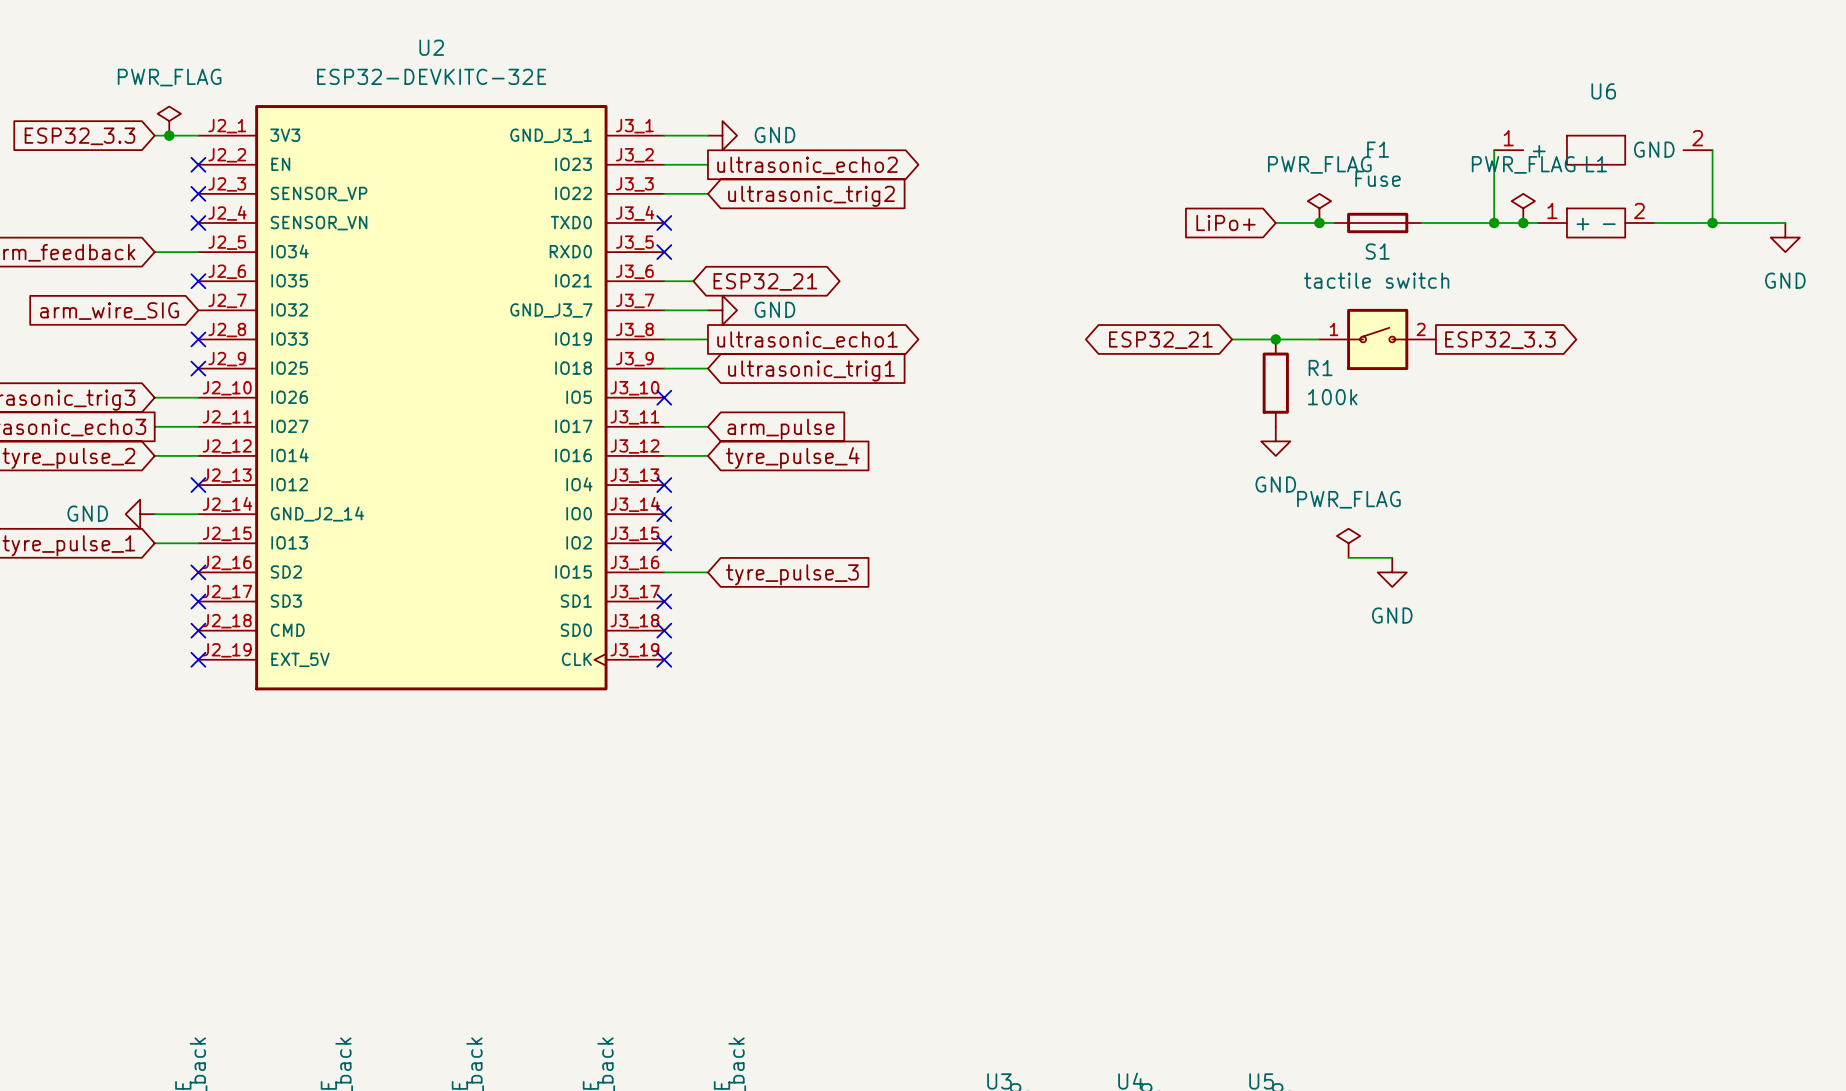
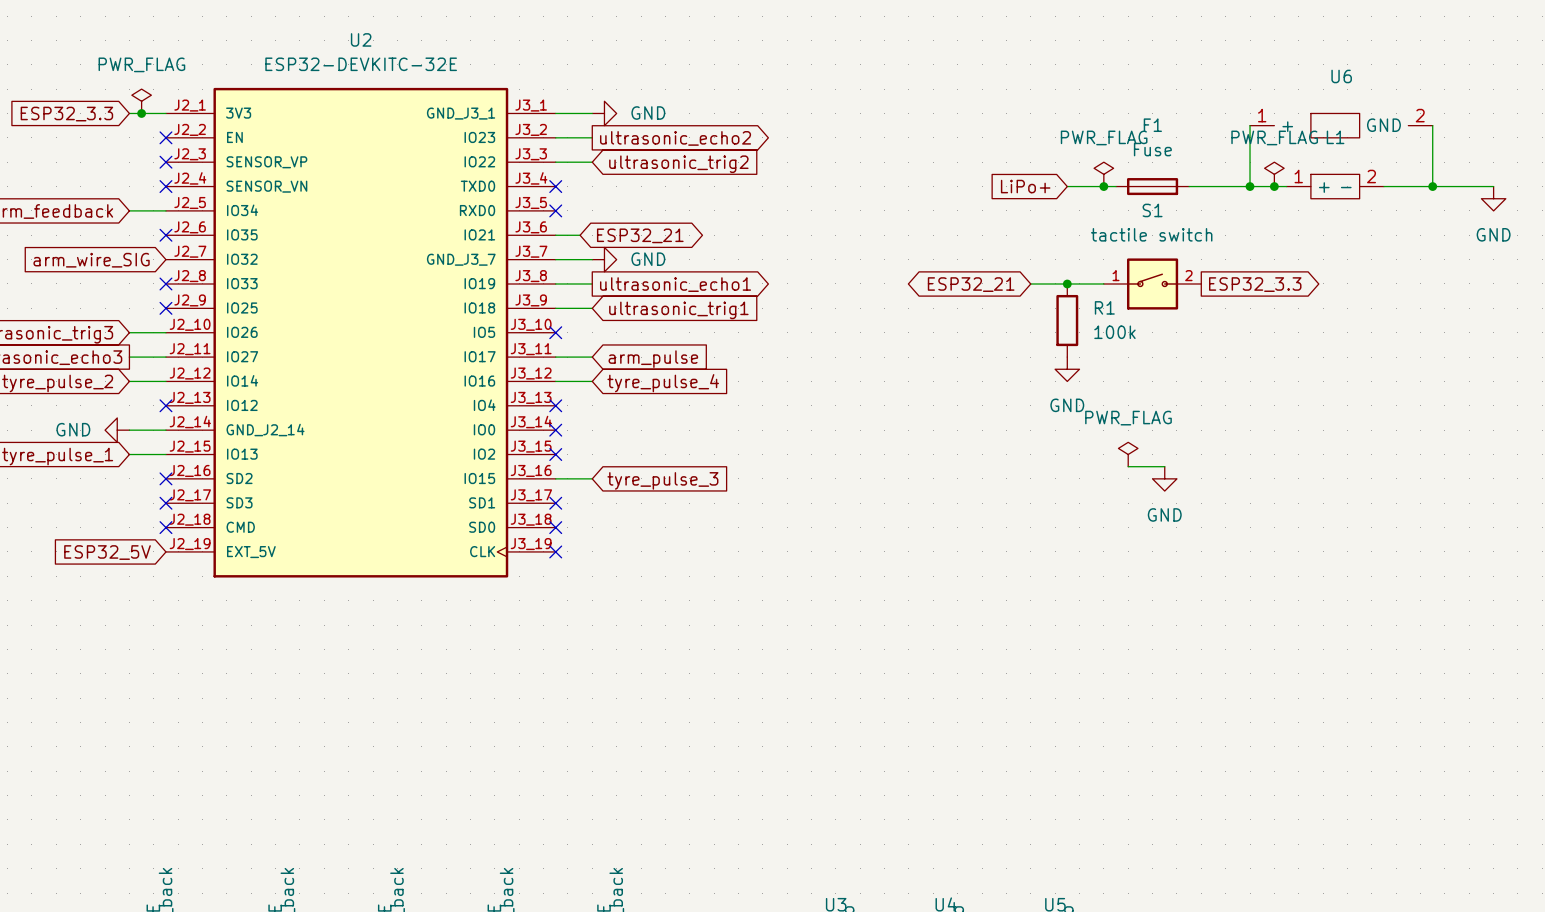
no-connect mark: (198, 659) -> none
global label: none -> ESP32_5V (107, 552)

